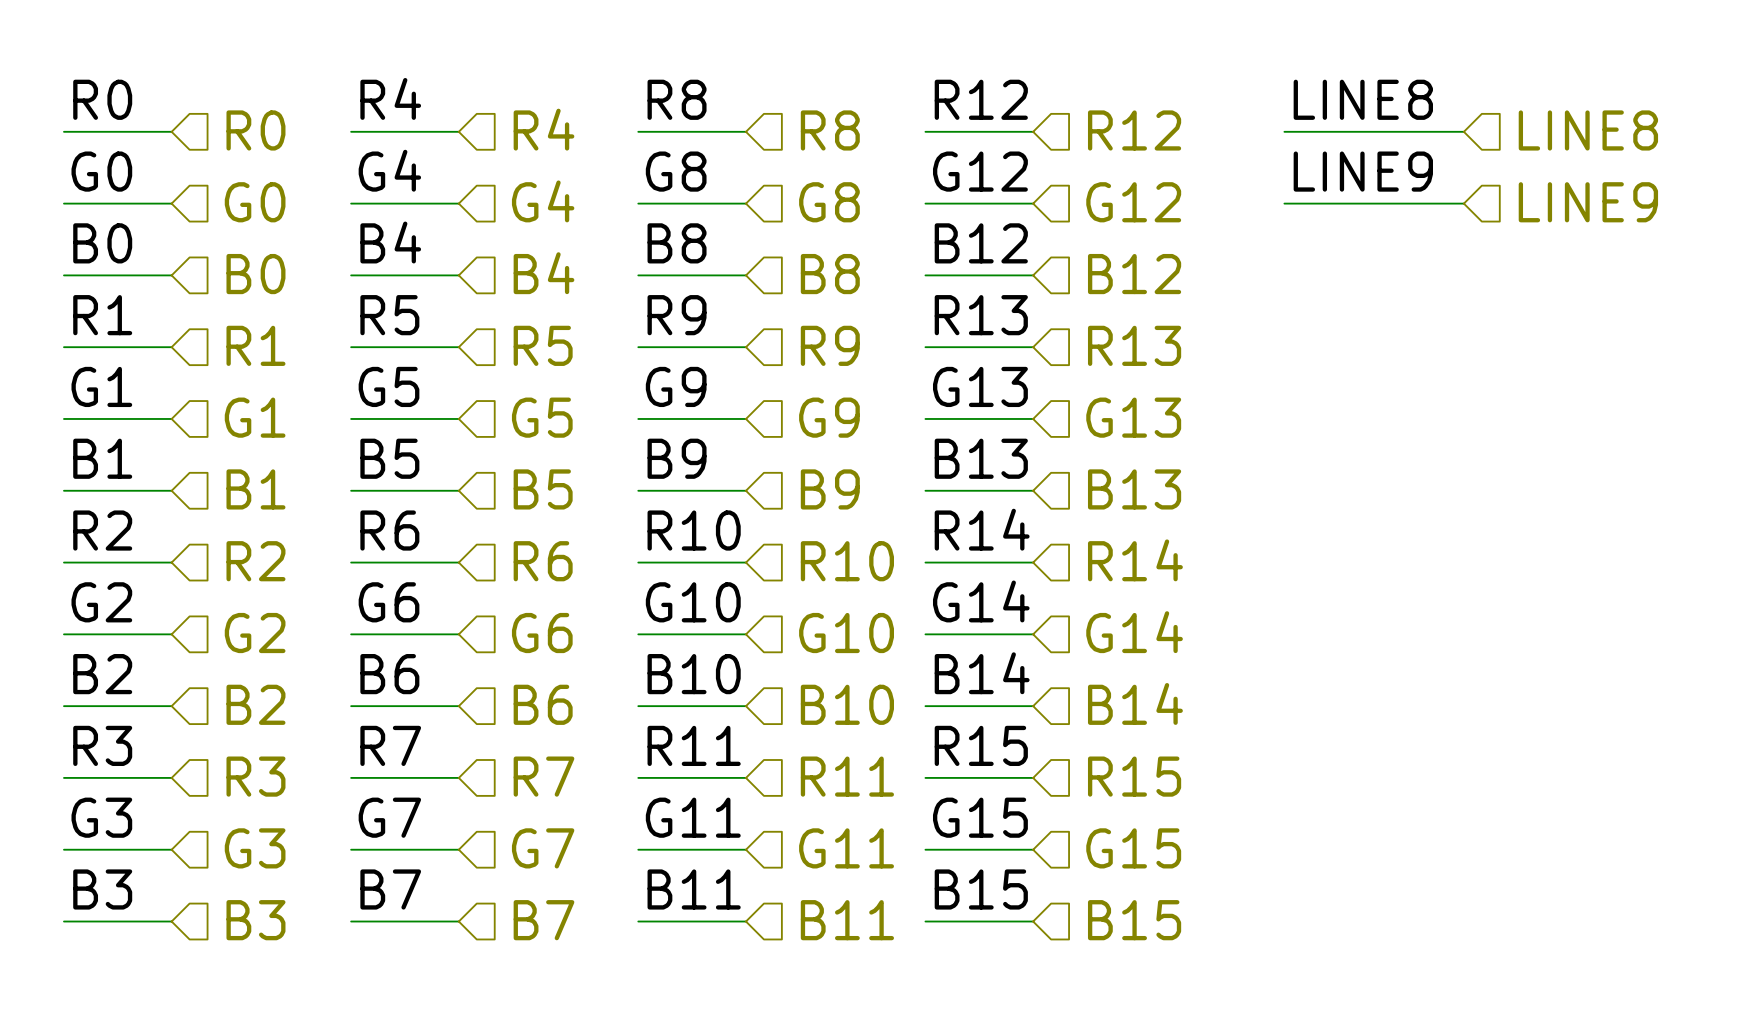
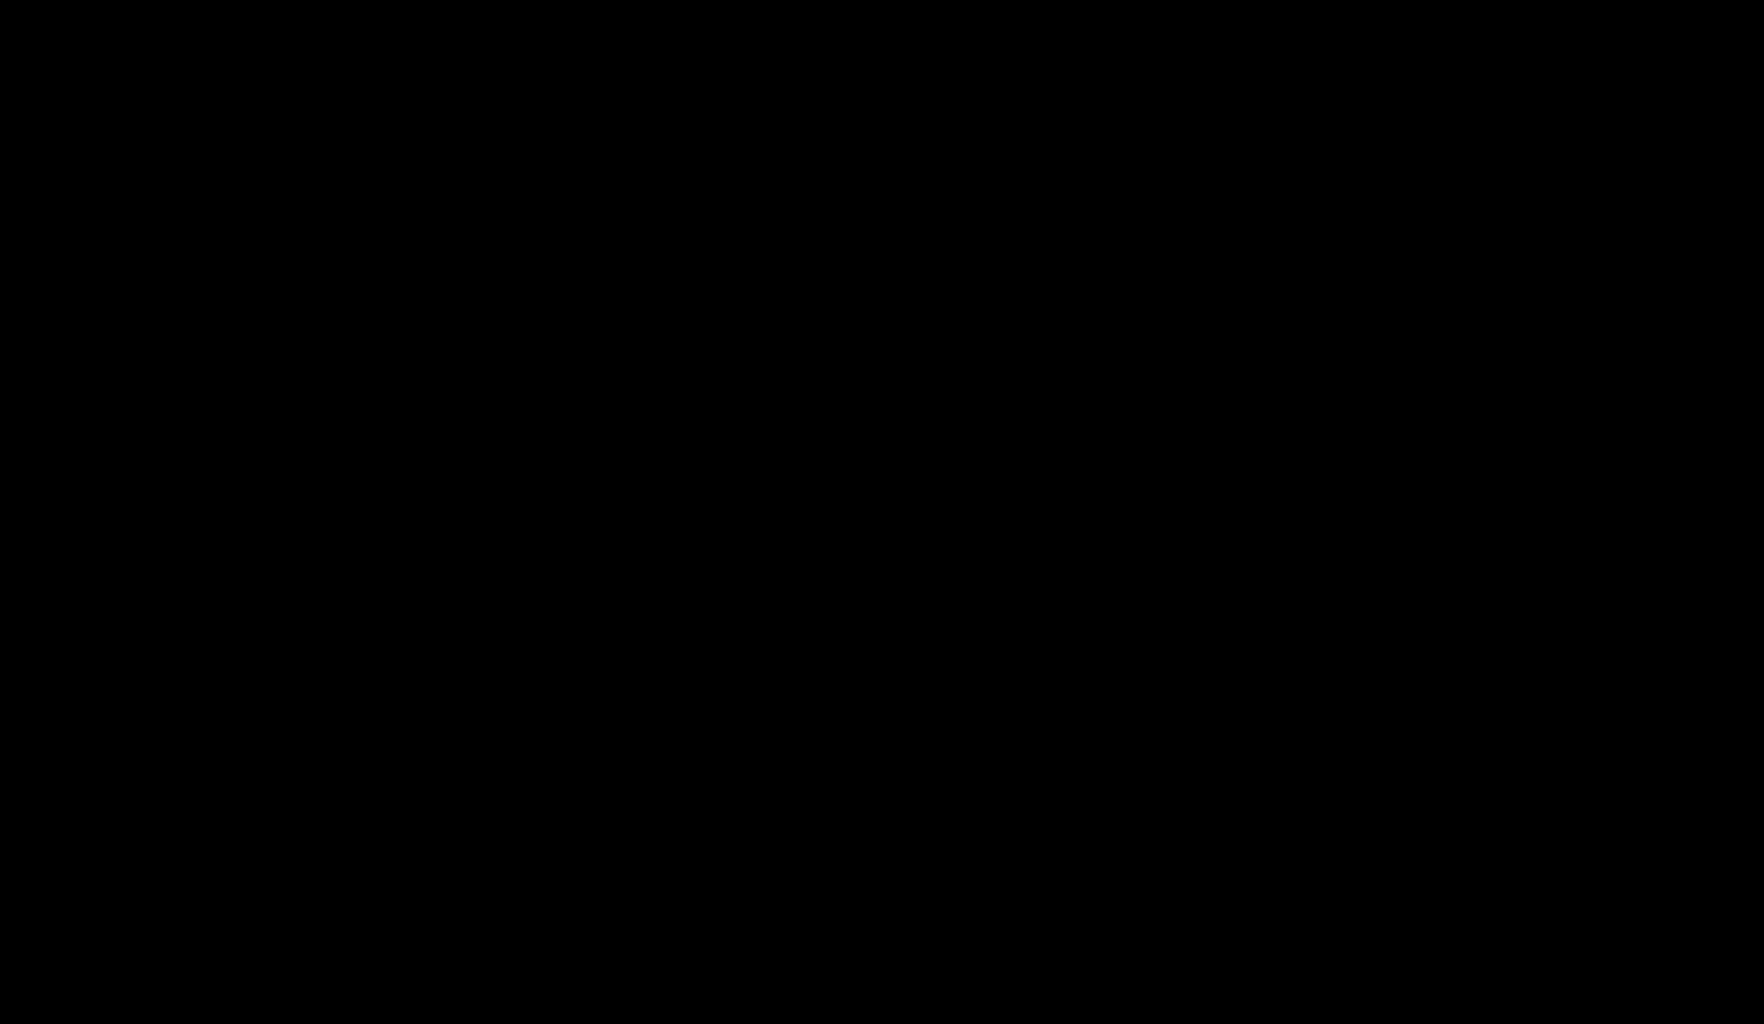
label: R4 (390, 98) -> none
label: R0 (102, 99) -> none
label: R8 (677, 99) -> none
label: R12 (981, 99) -> none
label: LINE8 (1363, 99) -> none
hierarchical label: R4 (543, 129) -> none
hierarchical label: R0 (255, 130) -> none
hierarchical label: R8 (830, 130) -> none
hierarchical label: R12 (1134, 130) -> none
hierarchical label: LINE8 (1588, 130) -> none
wire: (63, 131) (171, 131) -> none
wire: (351, 131) (458, 131) -> none
wire: (638, 131) (745, 131) -> none
wire: (925, 131) (1033, 131) -> none
wire: (1284, 131) (1463, 131) -> none
label: G4 (389, 170) -> none
label: G0 (101, 171) -> none
label: G8 (676, 171) -> none
label: G12 (980, 171) -> none
label: LINE9 (1363, 171) -> none
hierarchical label: G4 (543, 201) -> none
hierarchical label: G0 (255, 202) -> none
hierarchical label: G8 (829, 202) -> none
hierarchical label: G12 (1133, 202) -> none
hierarchical label: LINE9 (1588, 202) -> none
wire: (63, 203) (171, 203) -> none
wire: (351, 203) (458, 203) -> none
wire: (638, 203) (745, 203) -> none
wire: (925, 203) (1033, 203) -> none
wire: (1284, 203) (1463, 203) -> none
label: B4 (390, 242) -> none
label: B0 (102, 243) -> none
label: B8 (677, 243) -> none
label: B12 (981, 243) -> none
hierarchical label: B4 (543, 273) -> none
hierarchical label: B0 (255, 274) -> none
hierarchical label: B8 (830, 274) -> none
hierarchical label: B12 (1134, 274) -> none
wire: (63, 275) (171, 275) -> none
wire: (351, 275) (458, 275) -> none
wire: (638, 275) (745, 275) -> none
wire: (925, 275) (1033, 275) -> none
label: R1 (102, 315) -> none
label: R5 (389, 315) -> none
label: R9 (677, 315) -> none
label: R13 (981, 315) -> none
hierarchical label: R1 (255, 345) -> none
hierarchical label: R5 (543, 345) -> none
hierarchical label: R9 (830, 345) -> none
hierarchical label: R13 (1134, 345) -> none
wire: (63, 347) (171, 347) -> none
wire: (351, 347) (458, 347) -> none
wire: (638, 347) (745, 347) -> none
wire: (925, 347) (1033, 347) -> none
label: G1 (101, 386) -> none
label: G5 (389, 386) -> none
label: G9 (676, 386) -> none
label: G13 (980, 386) -> none
hierarchical label: G1 (255, 417) -> none
hierarchical label: G5 (542, 417) -> none
hierarchical label: G9 (829, 417) -> none
hierarchical label: G13 (1133, 417) -> none
wire: (63, 418) (171, 418) -> none
wire: (351, 418) (458, 418) -> none
wire: (638, 418) (745, 418) -> none
wire: (925, 418) (1033, 418) -> none
label: B1 (102, 458) -> none
label: B5 (389, 458) -> none
label: B9 (677, 458) -> none
label: B13 (981, 458) -> none
hierarchical label: B1 (255, 489) -> none
hierarchical label: B5 (543, 489) -> none
hierarchical label: B9 (830, 489) -> none
hierarchical label: B13 (1134, 489) -> none
wire: (63, 490) (171, 490) -> none
wire: (351, 490) (458, 490) -> none
wire: (638, 490) (745, 490) -> none
wire: (925, 490) (1033, 490) -> none
label: R14 (982, 529) -> none
label: R2 (102, 530) -> none
label: R6 (389, 530) -> none
label: R10 (694, 530) -> none
hierarchical label: R14 (1135, 560) -> none
hierarchical label: R2 (255, 561) -> none
hierarchical label: R6 (543, 561) -> none
hierarchical label: R10 (847, 561) -> none
wire: (63, 562) (171, 562) -> none
wire: (351, 562) (458, 562) -> none
wire: (638, 562) (745, 562) -> none
wire: (925, 562) (1033, 562) -> none
label: G14 (981, 601) -> none
label: G2 (101, 602) -> none
label: G6 (389, 602) -> none
label: G10 (693, 602) -> none
hierarchical label: G14 (1134, 632) -> none
hierarchical label: G2 (255, 633) -> none
hierarchical label: G6 (542, 633) -> none
hierarchical label: G10 (846, 633) -> none
wire: (63, 634) (171, 634) -> none
wire: (351, 634) (458, 634) -> none
wire: (638, 634) (745, 634) -> none
wire: (925, 634) (1033, 634) -> none
label: B14 (982, 673) -> none
label: B2 (102, 674) -> none
label: B6 (389, 674) -> none
label: B10 (694, 674) -> none
hierarchical label: B14 (1135, 703) -> none
hierarchical label: B2 (255, 704) -> none
hierarchical label: B6 (543, 704) -> none
hierarchical label: B10 (847, 704) -> none
wire: (63, 706) (171, 706) -> none
wire: (351, 706) (458, 706) -> none
wire: (638, 706) (745, 706) -> none
wire: (925, 706) (1033, 706) -> none
label: R3 (102, 745) -> none
label: R7 (390, 745) -> none
label: R11 (694, 745) -> none
label: R15 (981, 745) -> none
hierarchical label: R3 (255, 776) -> none
hierarchical label: R7 (543, 776) -> none
hierarchical label: R11 (847, 776) -> none
hierarchical label: R15 (1134, 776) -> none
wire: (63, 777) (171, 777) -> none
wire: (351, 777) (458, 777) -> none
wire: (638, 777) (745, 777) -> none
wire: (925, 777) (1033, 777) -> none
label: G3 (101, 817) -> none
label: G7 (389, 817) -> none
label: G11 (693, 817) -> none
label: G15 (980, 817) -> none
hierarchical label: G3 (255, 848) -> none
hierarchical label: G7 (543, 848) -> none
hierarchical label: G11 (846, 848) -> none
hierarchical label: G15 (1133, 848) -> none
wire: (63, 849) (171, 849) -> none
wire: (351, 849) (458, 849) -> none
wire: (638, 849) (745, 849) -> none
wire: (925, 849) (1033, 849) -> none
label: B3 (102, 889) -> none
label: B7 (390, 889) -> none
label: B11 (694, 889) -> none
label: B15 (981, 889) -> none
hierarchical label: B3 (255, 920) -> none
hierarchical label: B7 (543, 920) -> none
hierarchical label: B11 (847, 920) -> none
hierarchical label: B15 (1134, 920) -> none
wire: (63, 921) (171, 921) -> none
wire: (351, 921) (458, 921) -> none
wire: (638, 921) (745, 921) -> none
wire: (925, 921) (1033, 921) -> none

